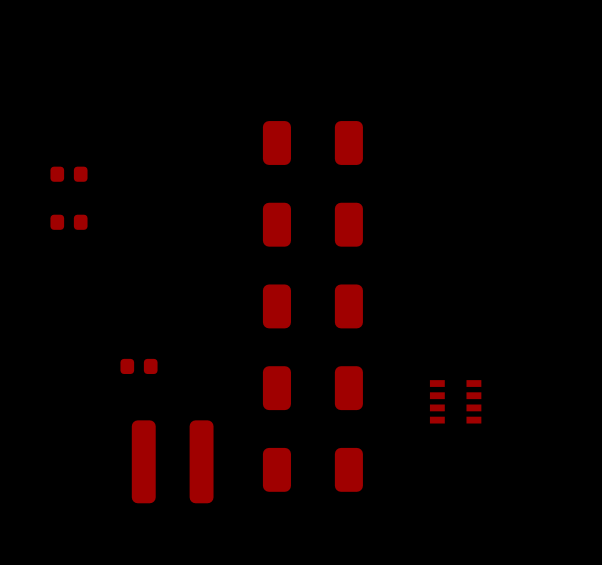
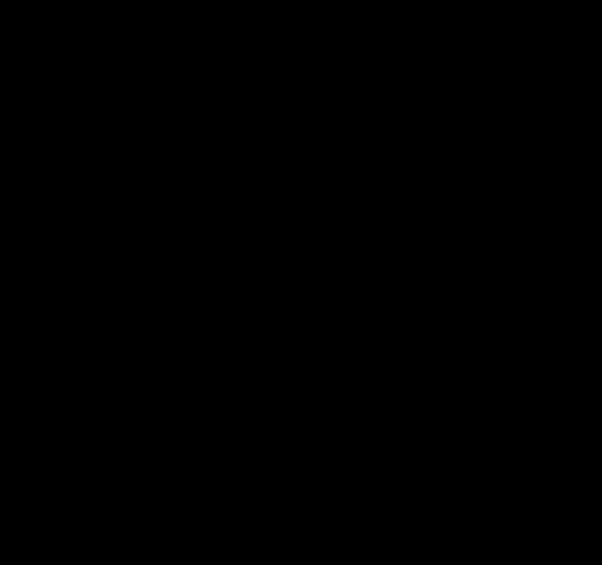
part: (312, 142) -> none
part: (68, 174) -> none
part: (68, 222) -> none
part: (312, 224) -> none
part: (312, 306) -> none
part: (139, 366) -> none
part: (312, 388) -> none
part: (455, 401) -> none
part: (172, 461) -> none
part: (312, 469) -> none

